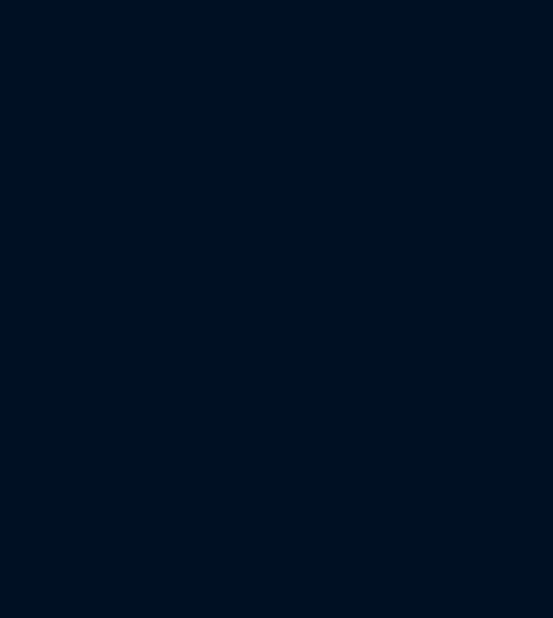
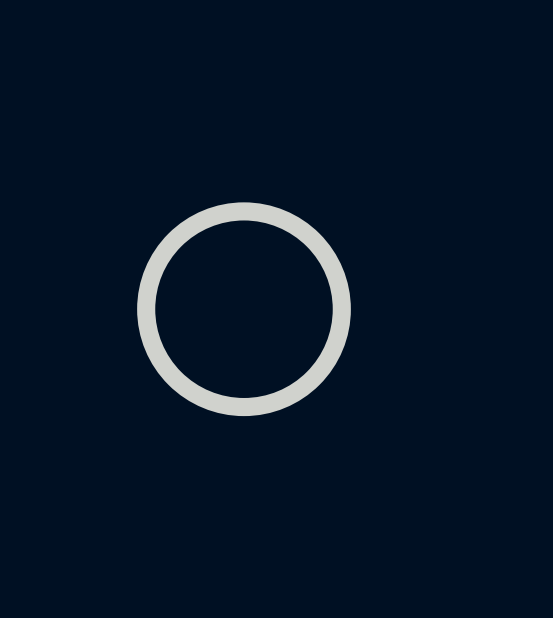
round board edge: none -> [137, 202, 351, 417]

